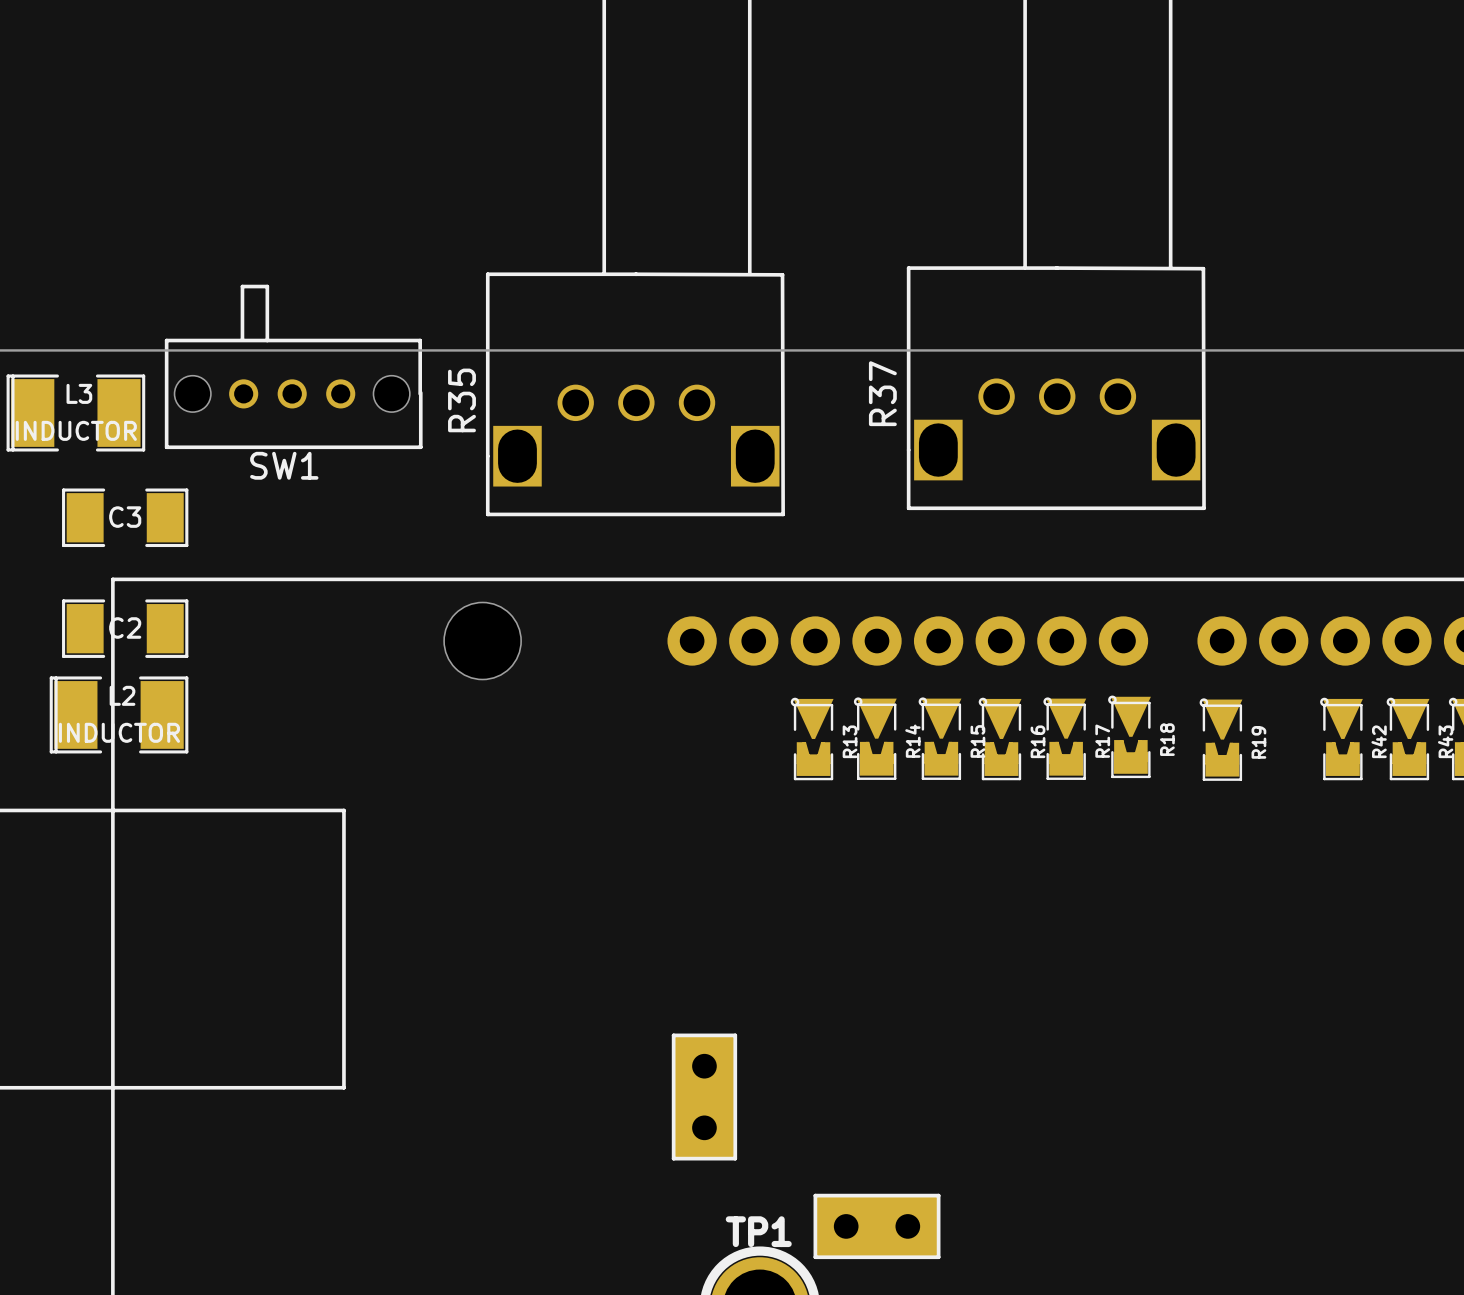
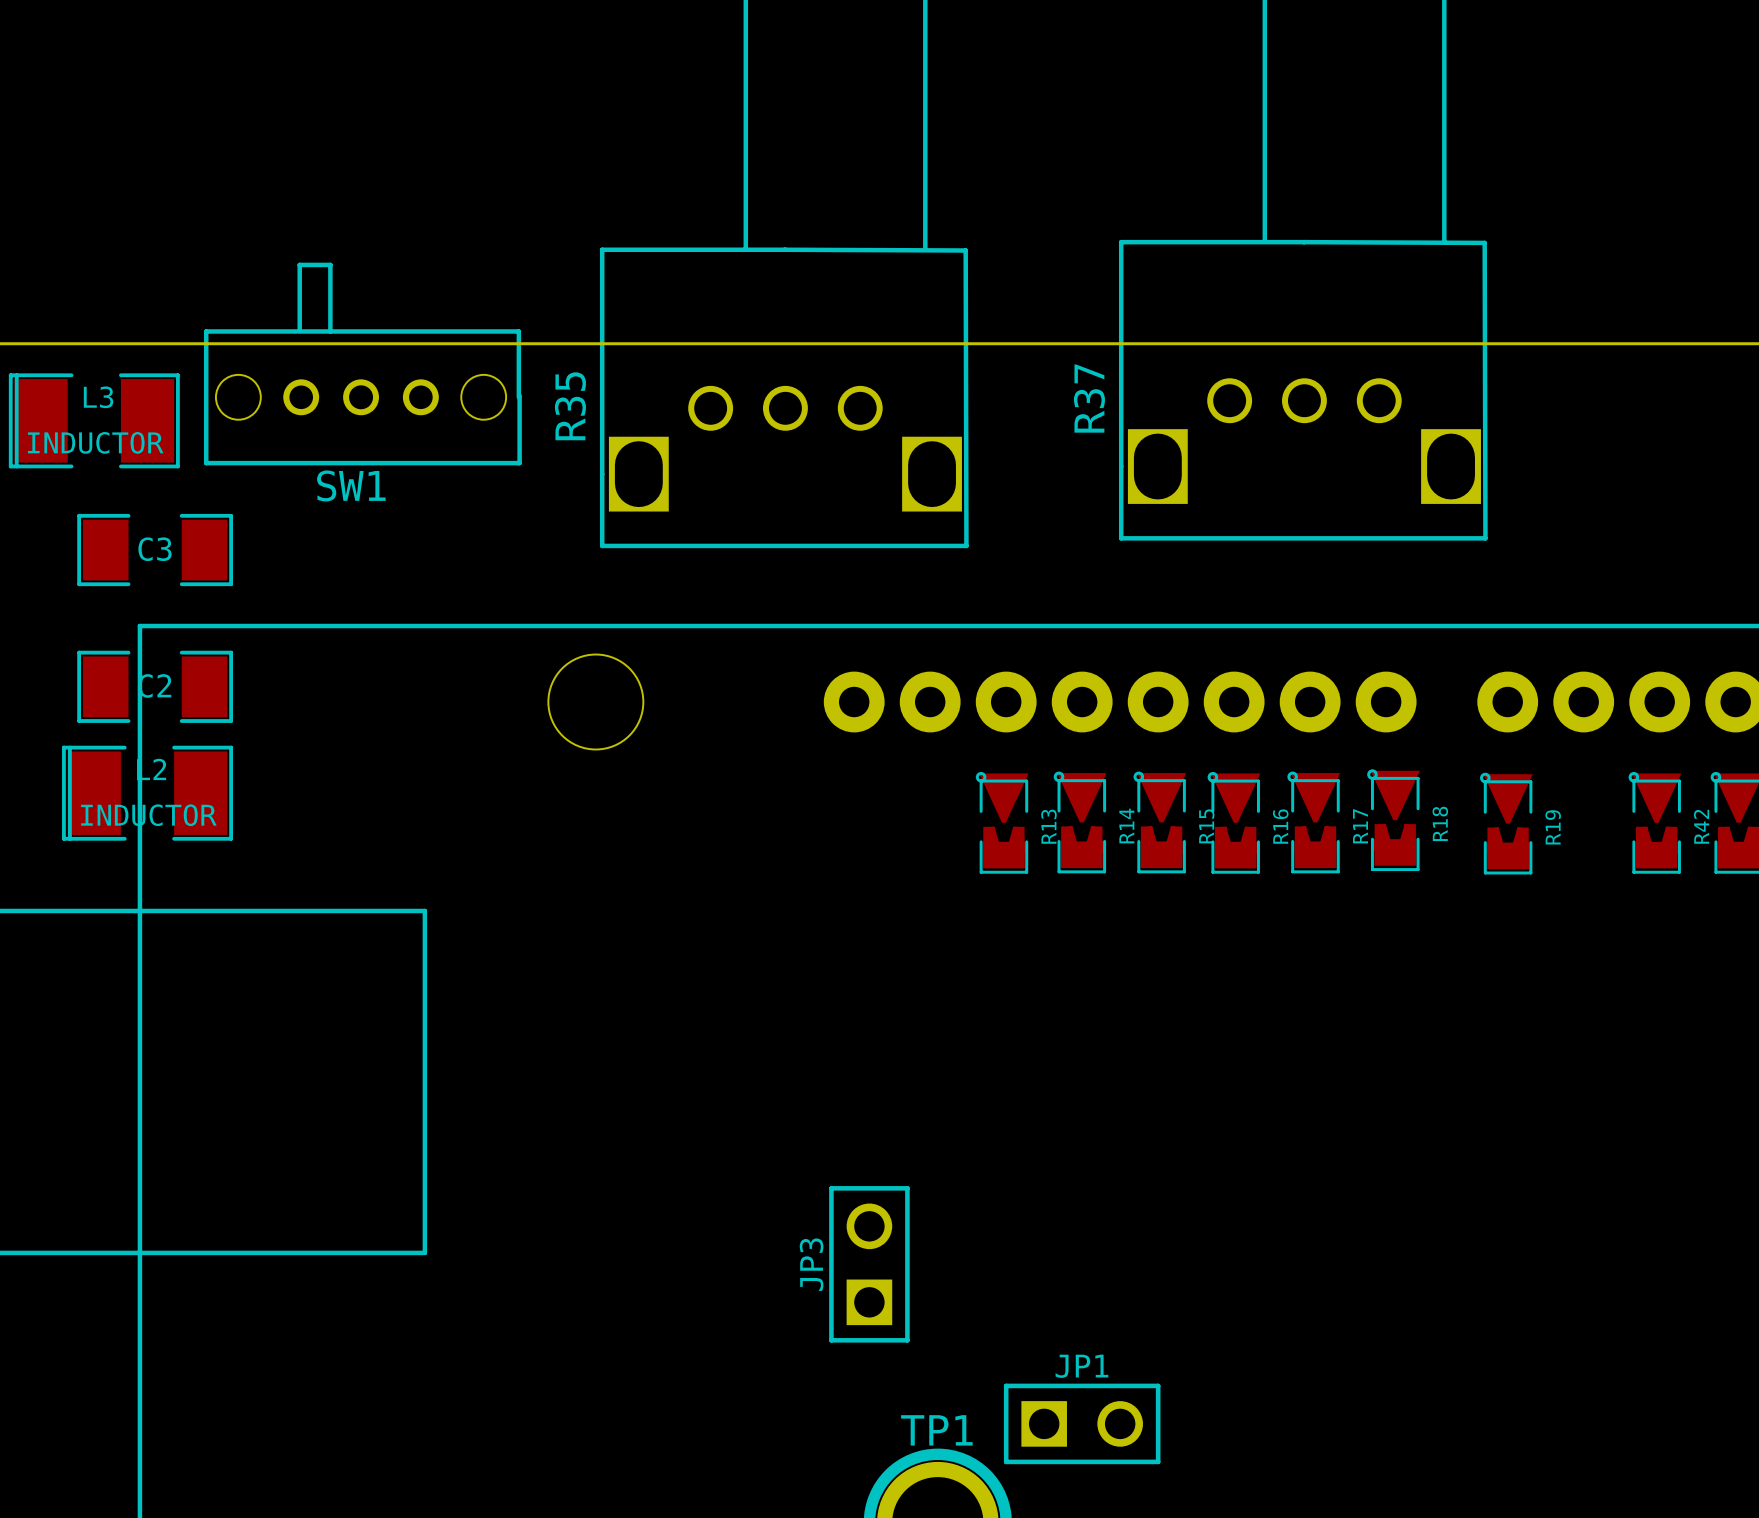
part: (704, 1097) -> none
JP3: none -> (869, 1264)
part: (877, 1226) -> none
JP1: none -> (1082, 1423)

